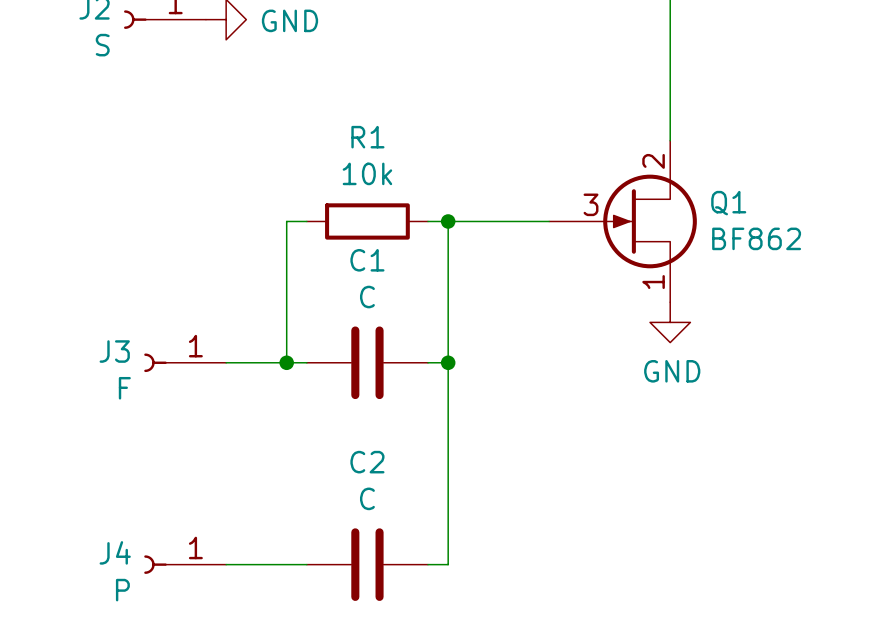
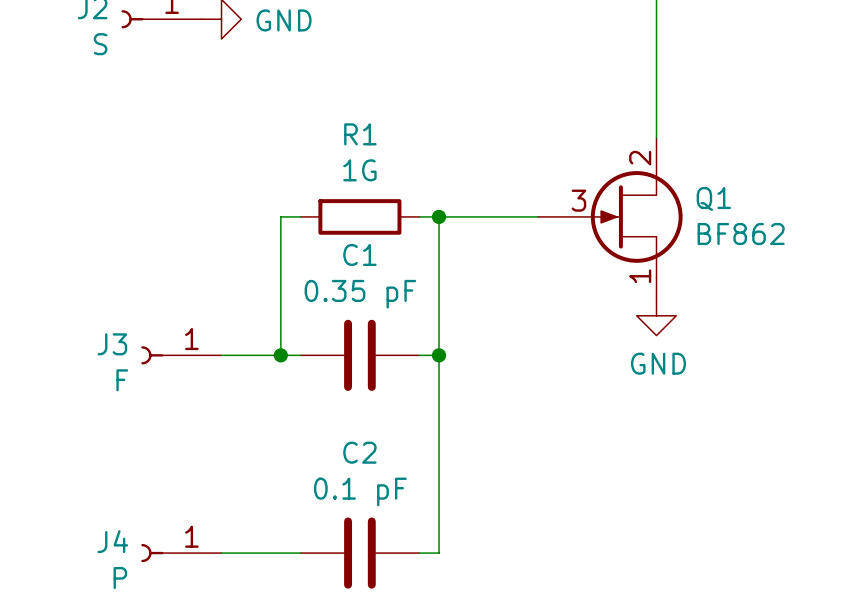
R1 value: 10k (367, 173) -> 1G (359, 170)
C1 value: C (367, 297) -> 0.35 pF (360, 294)
C2 value: C (367, 498) -> 0.1 pF (360, 491)

